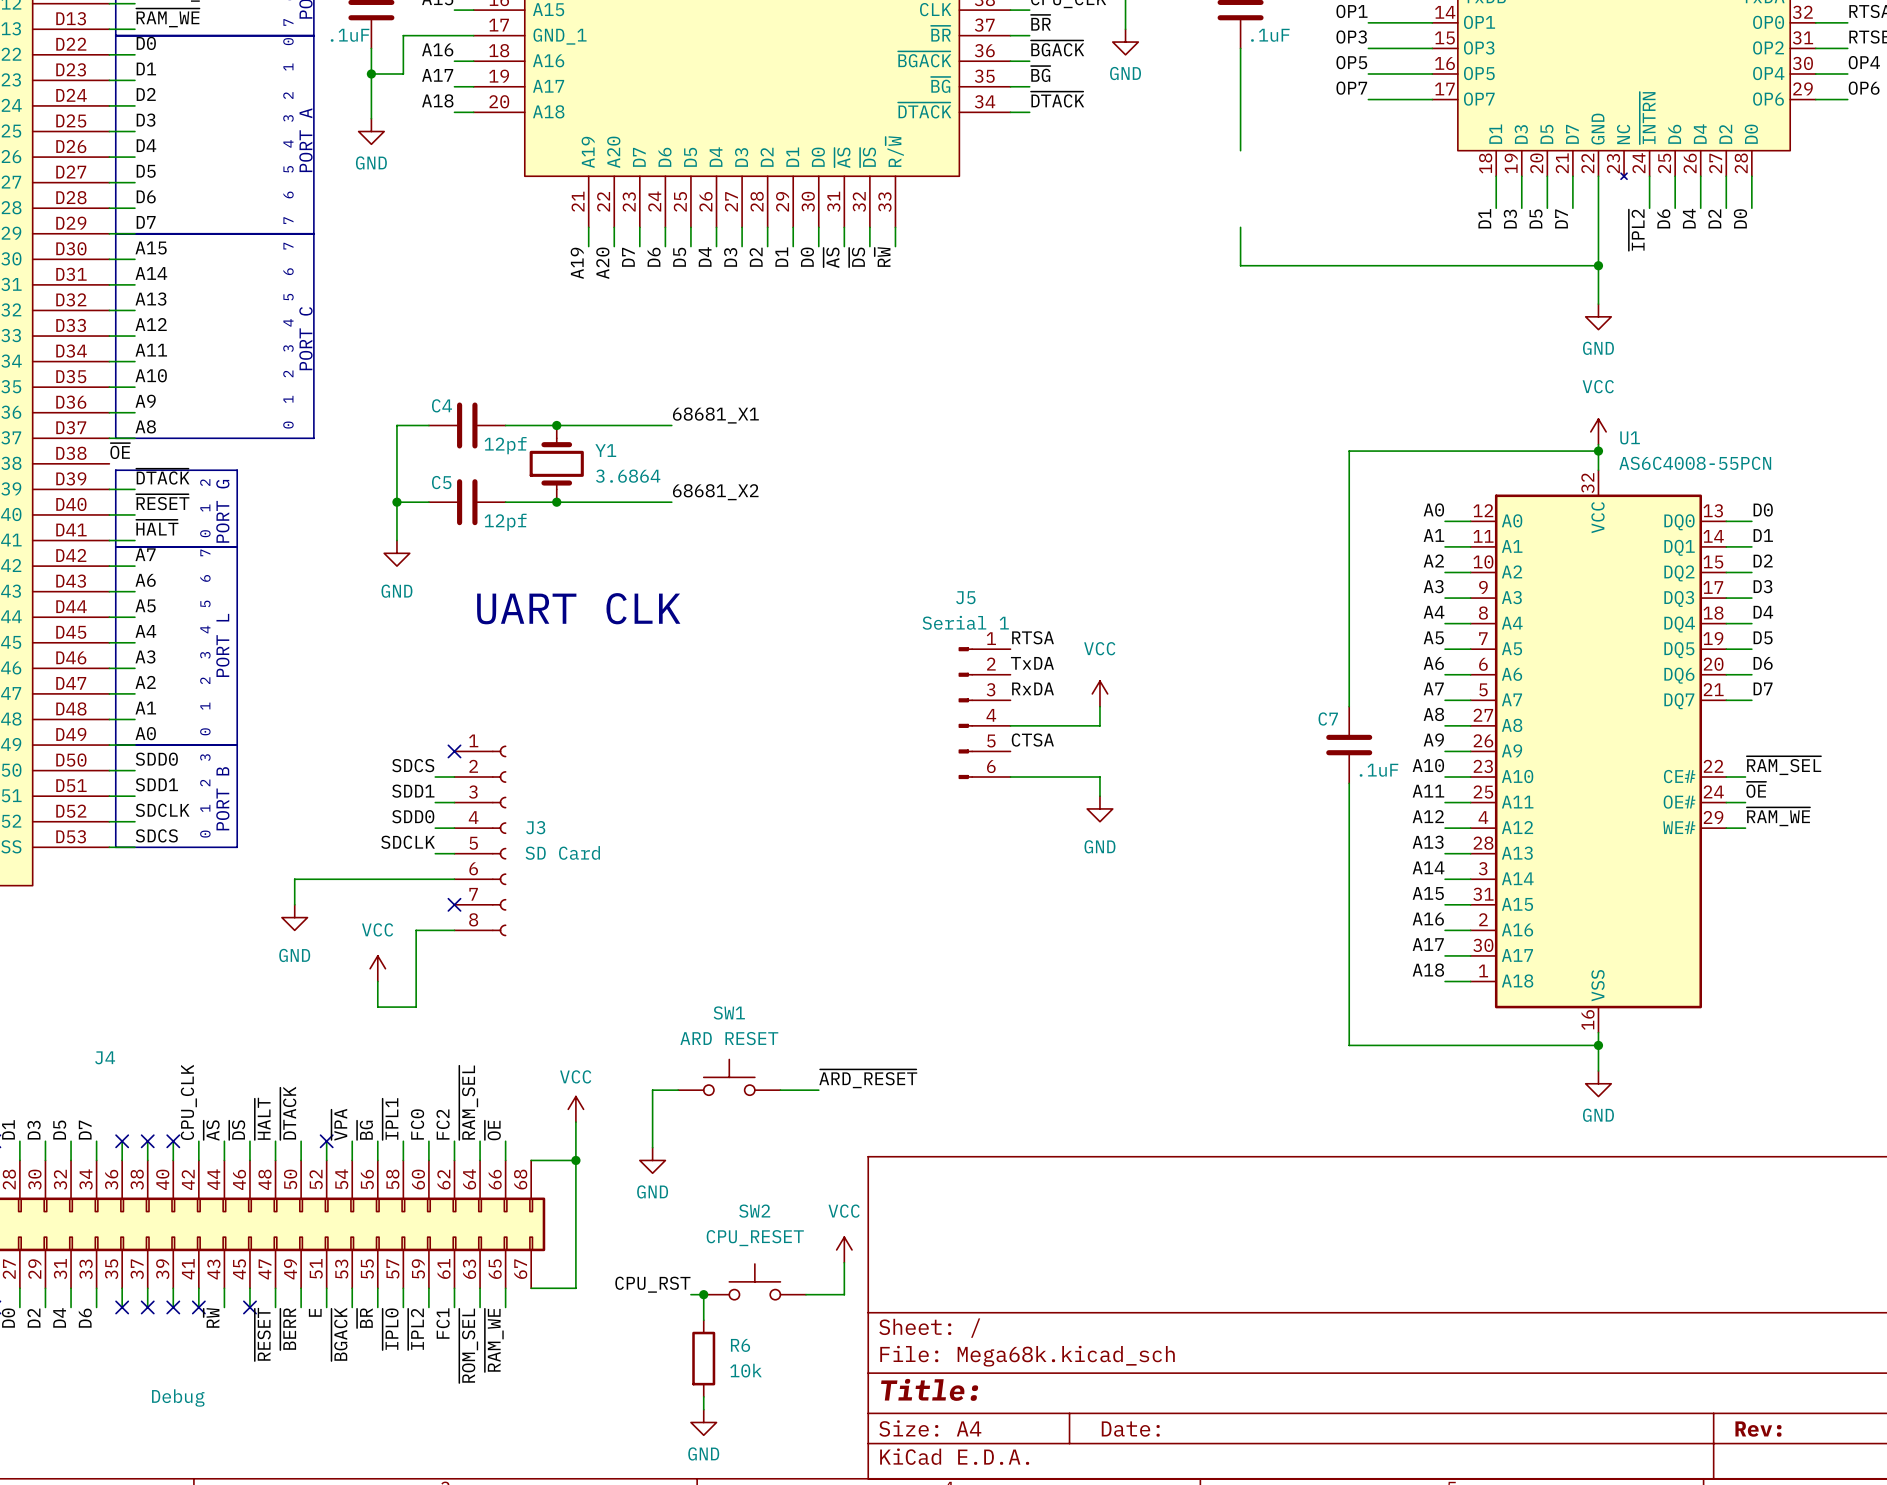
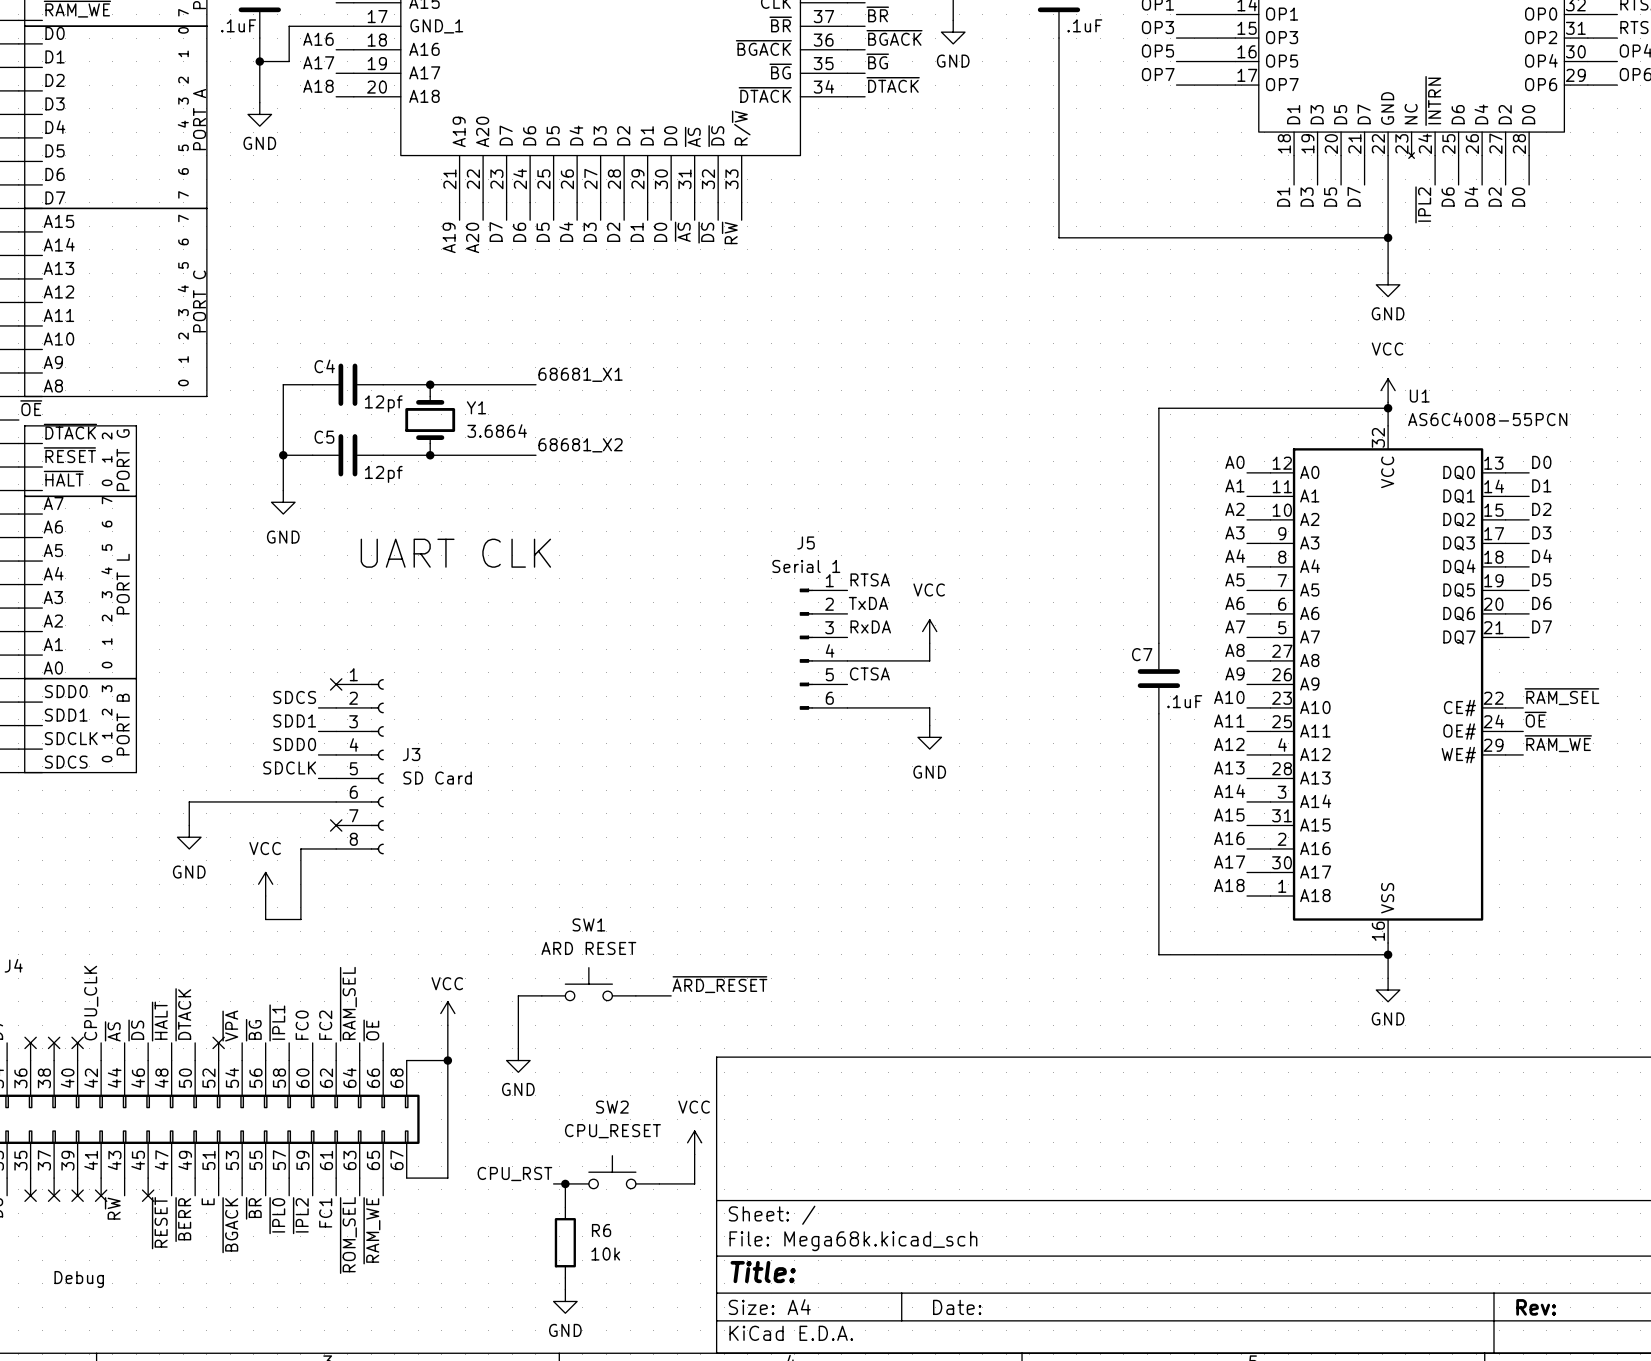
wire: none -> (1058, 132) (1058, 202)

